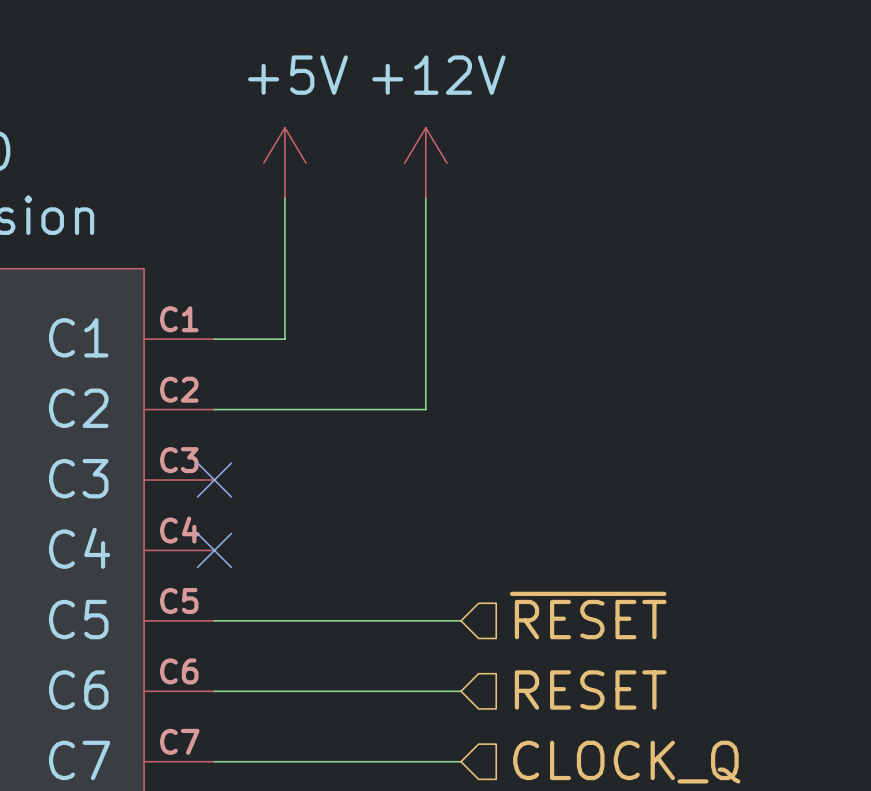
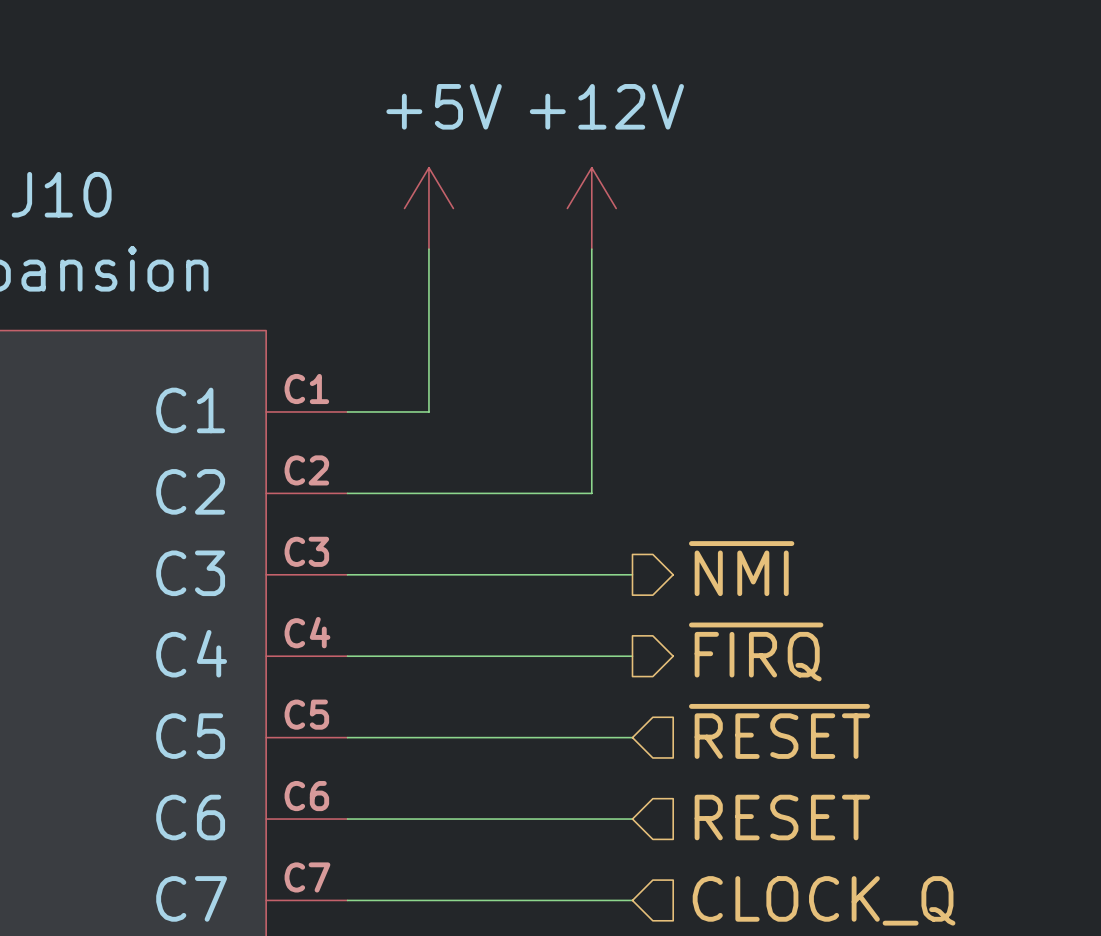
hierarchical label: none -> ~{NMI} (741, 568)
wire: none -> (347, 574) (632, 574)
no-connect mark: (214, 480) -> none
hierarchical label: none -> ~{FIRQ} (756, 651)
wire: none -> (347, 656) (632, 656)
no-connect mark: (214, 550) -> none

